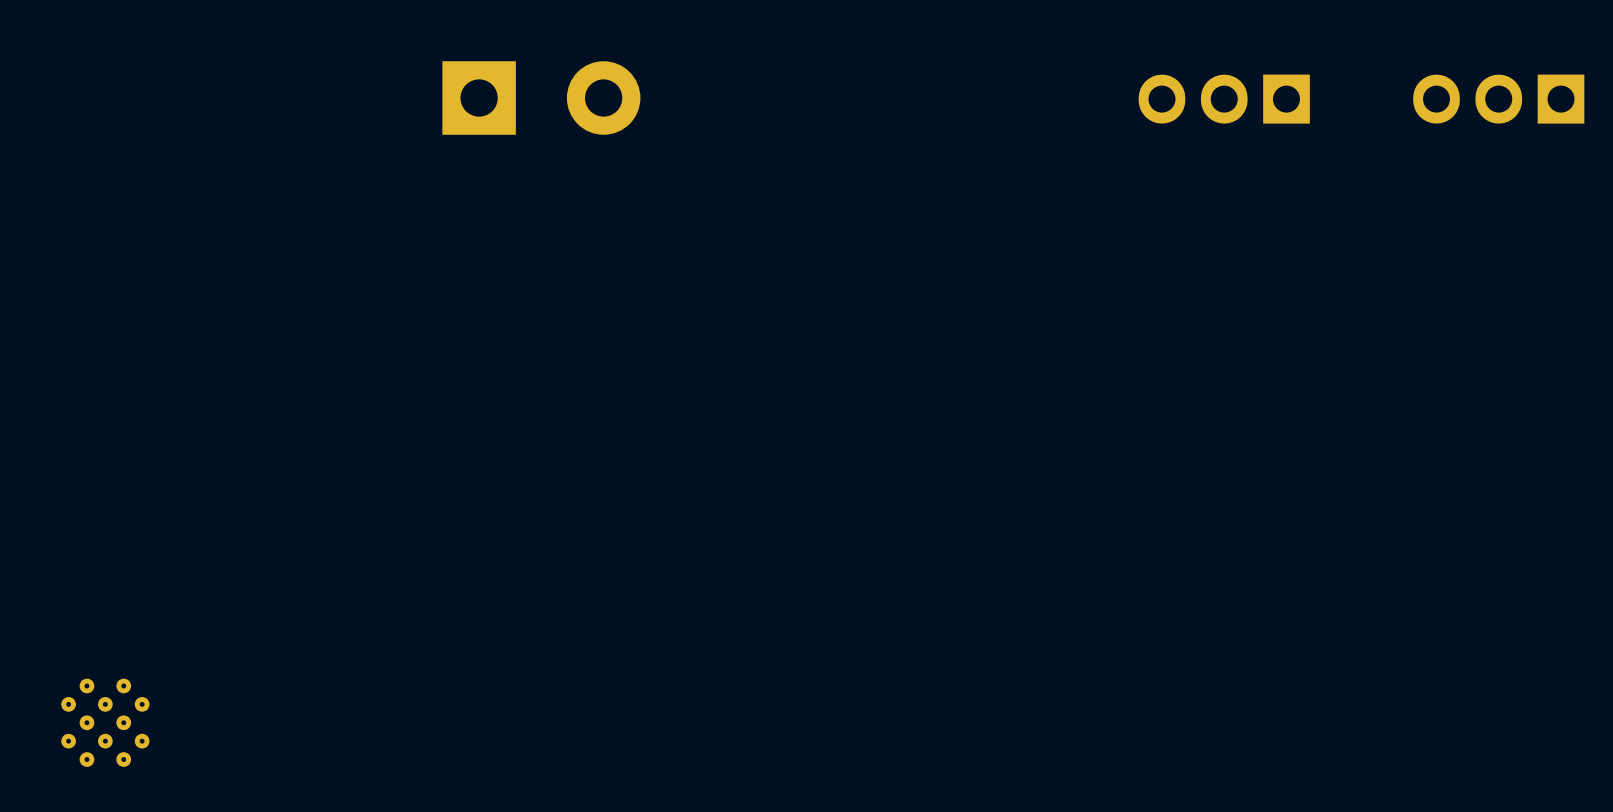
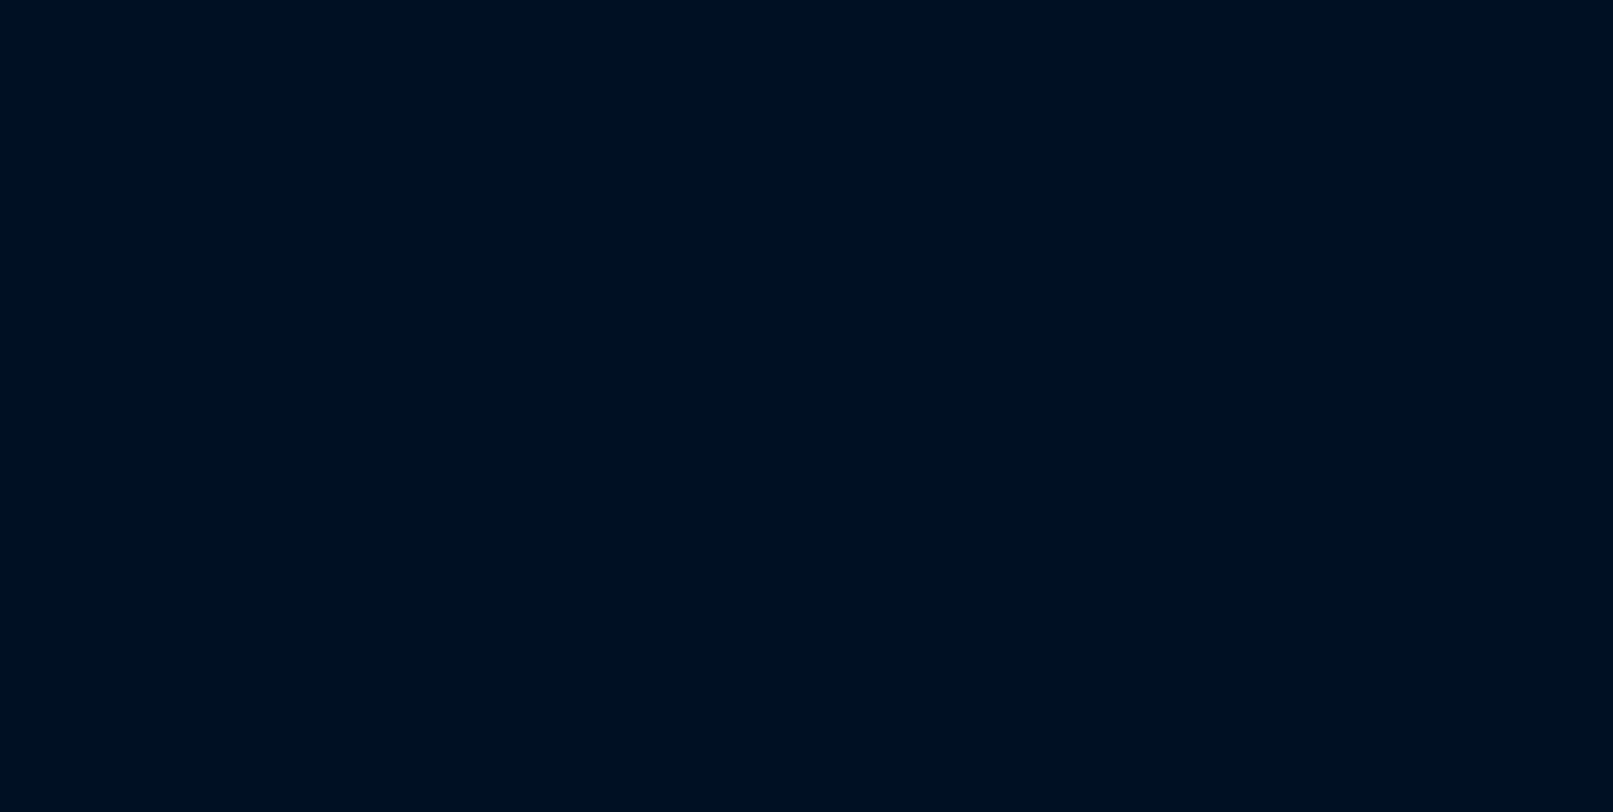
part: (541, 98) -> none
part: (1224, 99) -> none
part: (1498, 99) -> none
part: (105, 722) -> none

